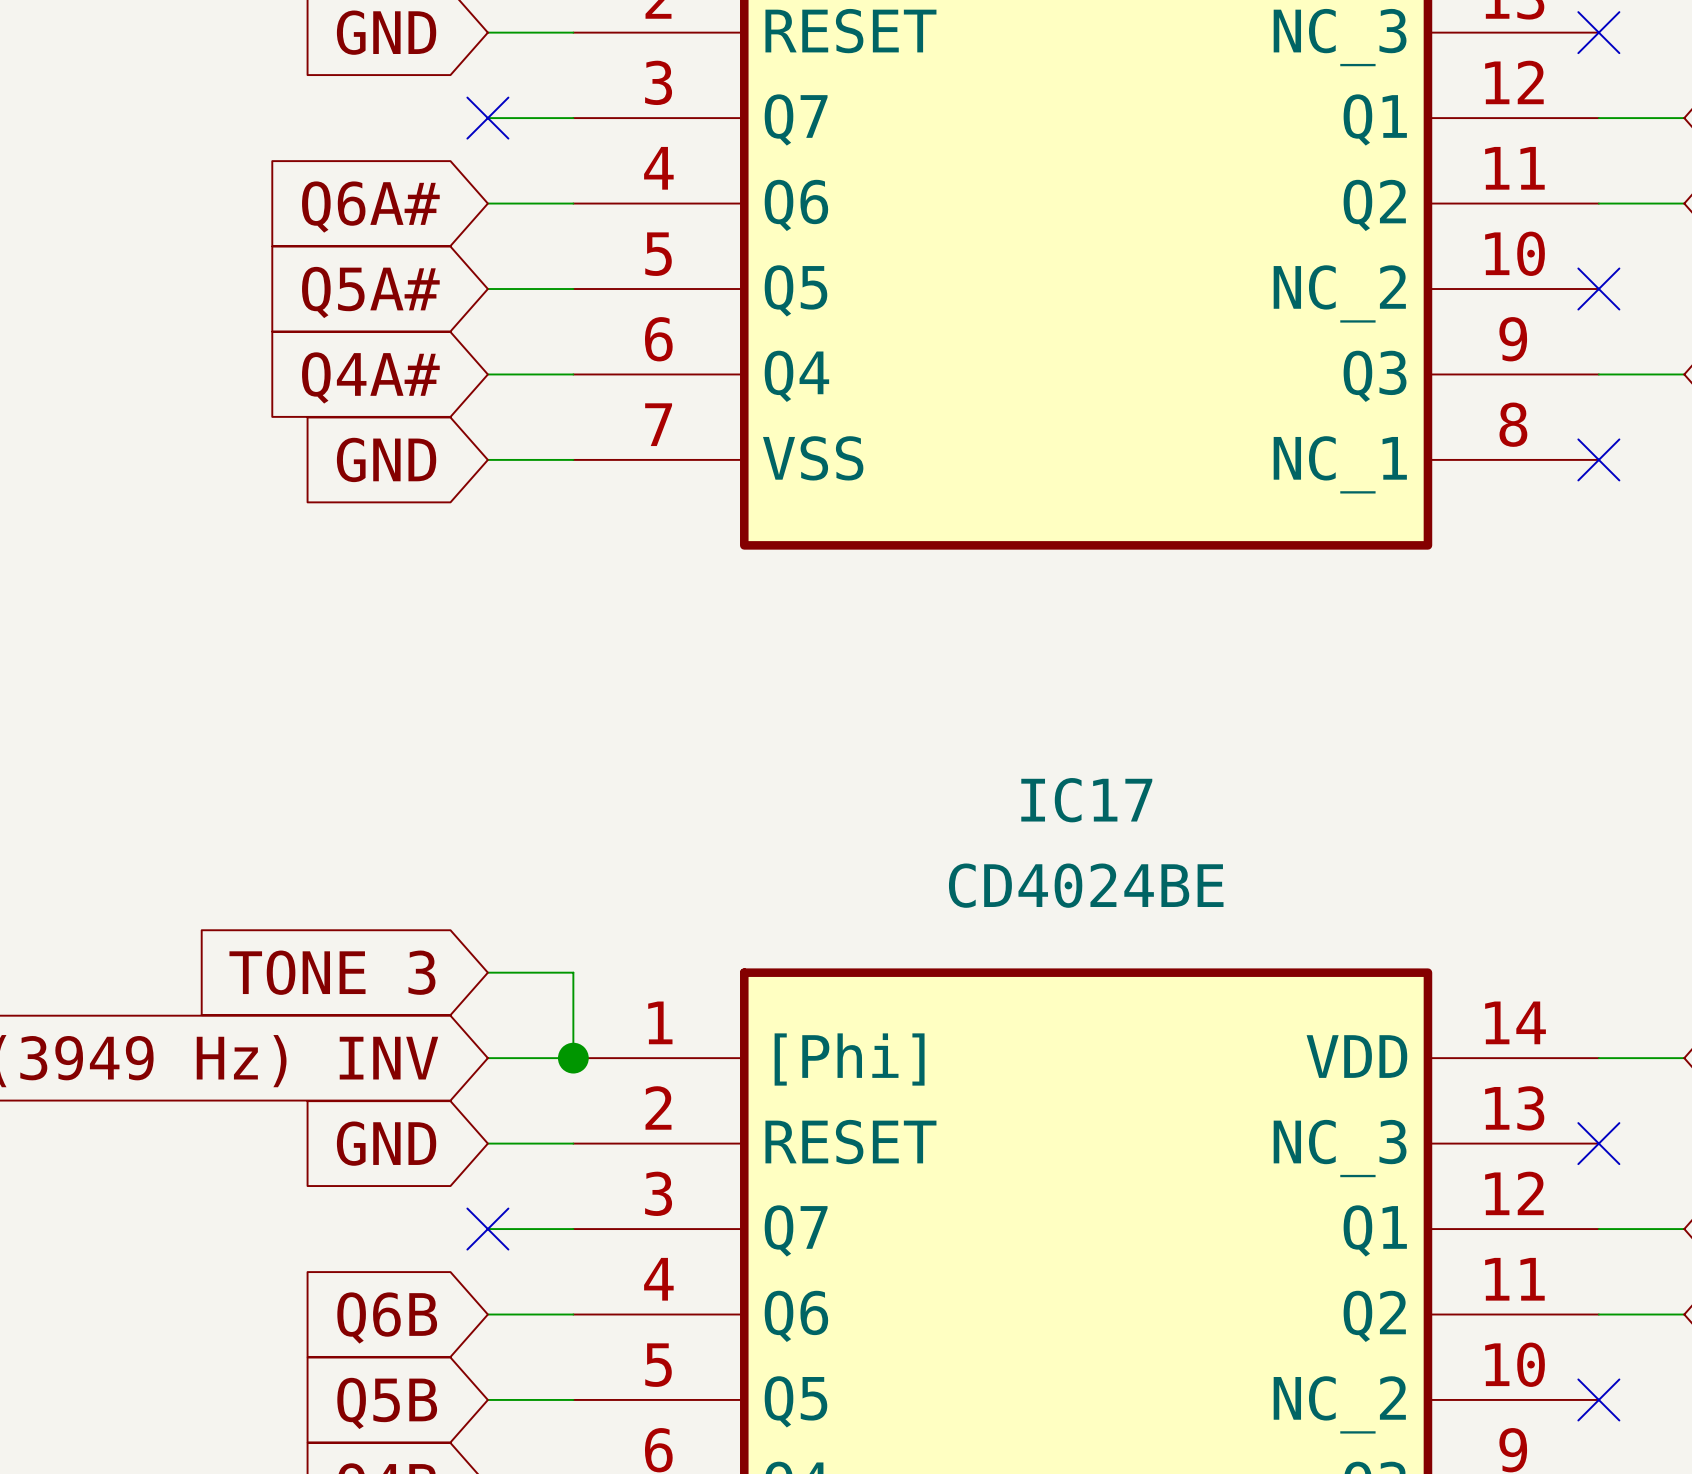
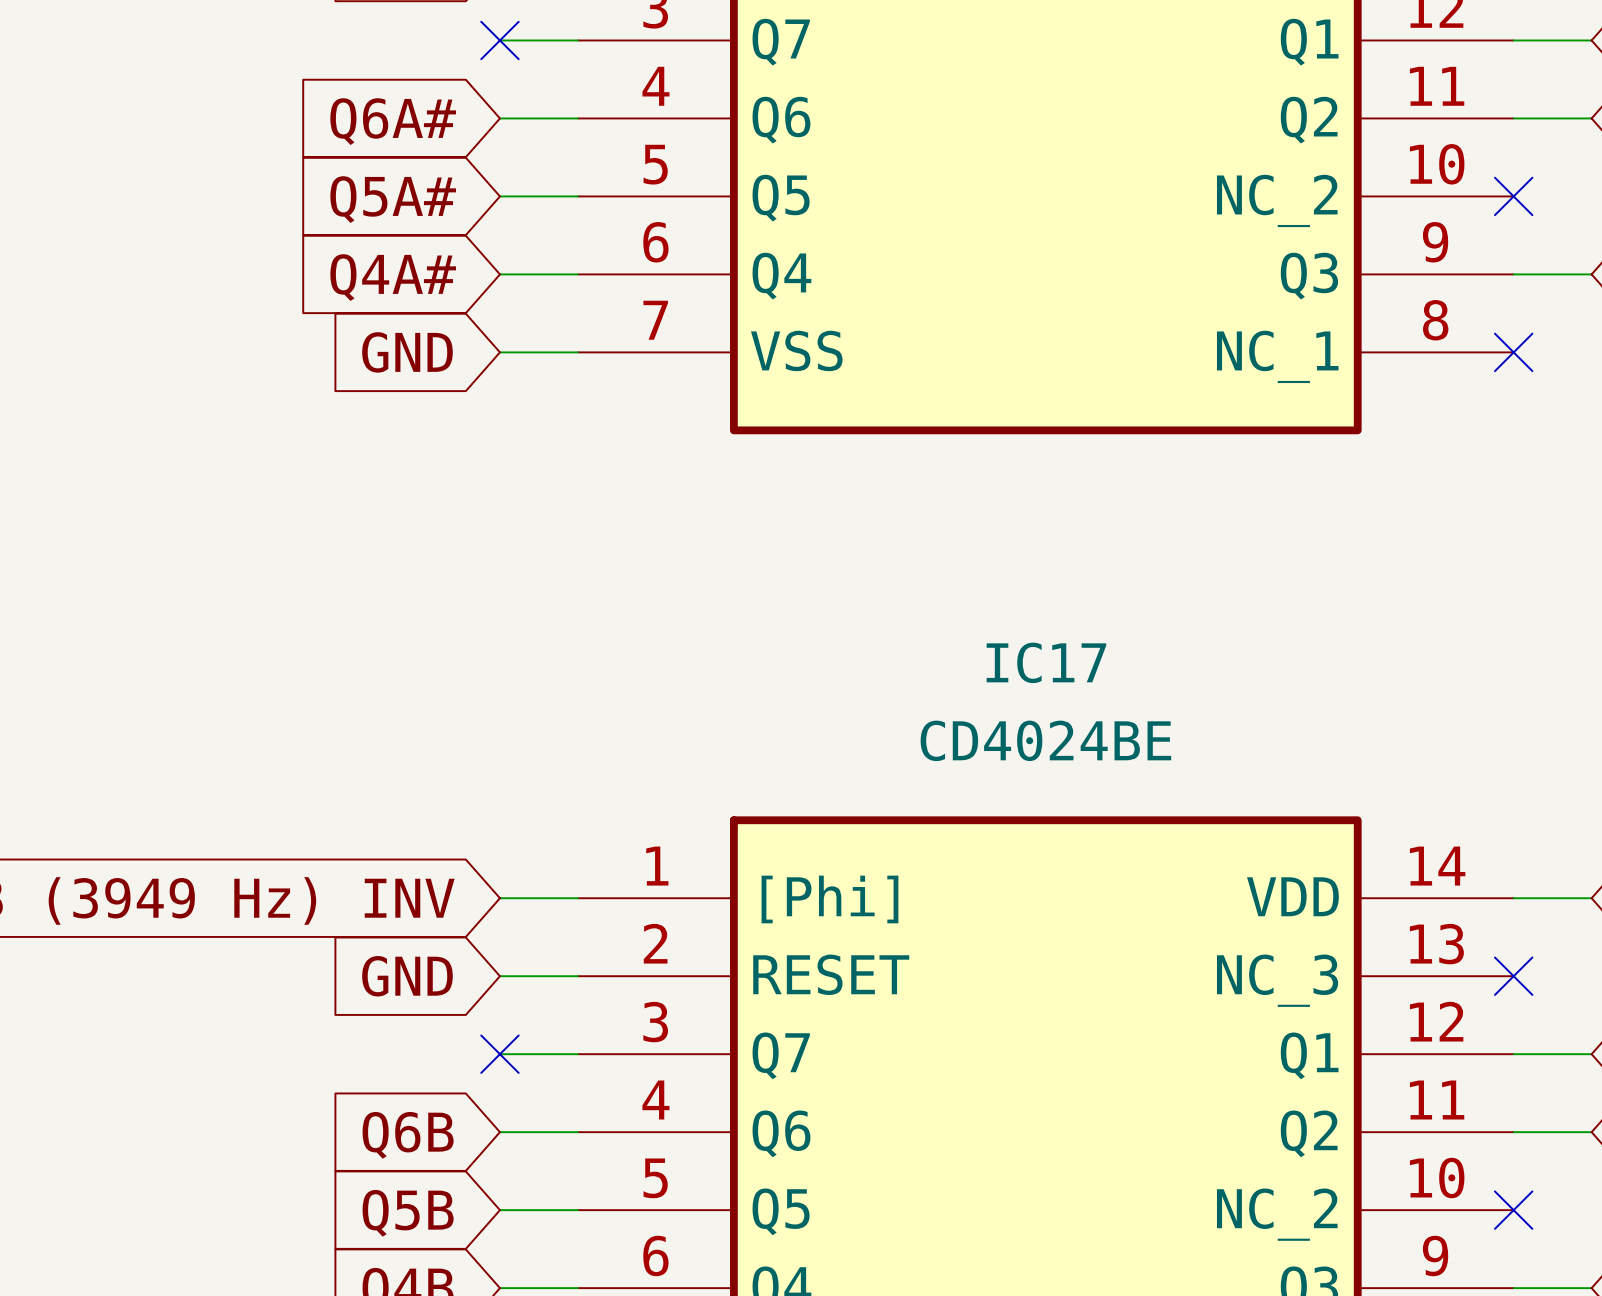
global label: TONE 3 (332, 972) -> none
wire: (487, 972) (573, 972) (573, 1058) -> none
junction: (573, 1058) -> none

